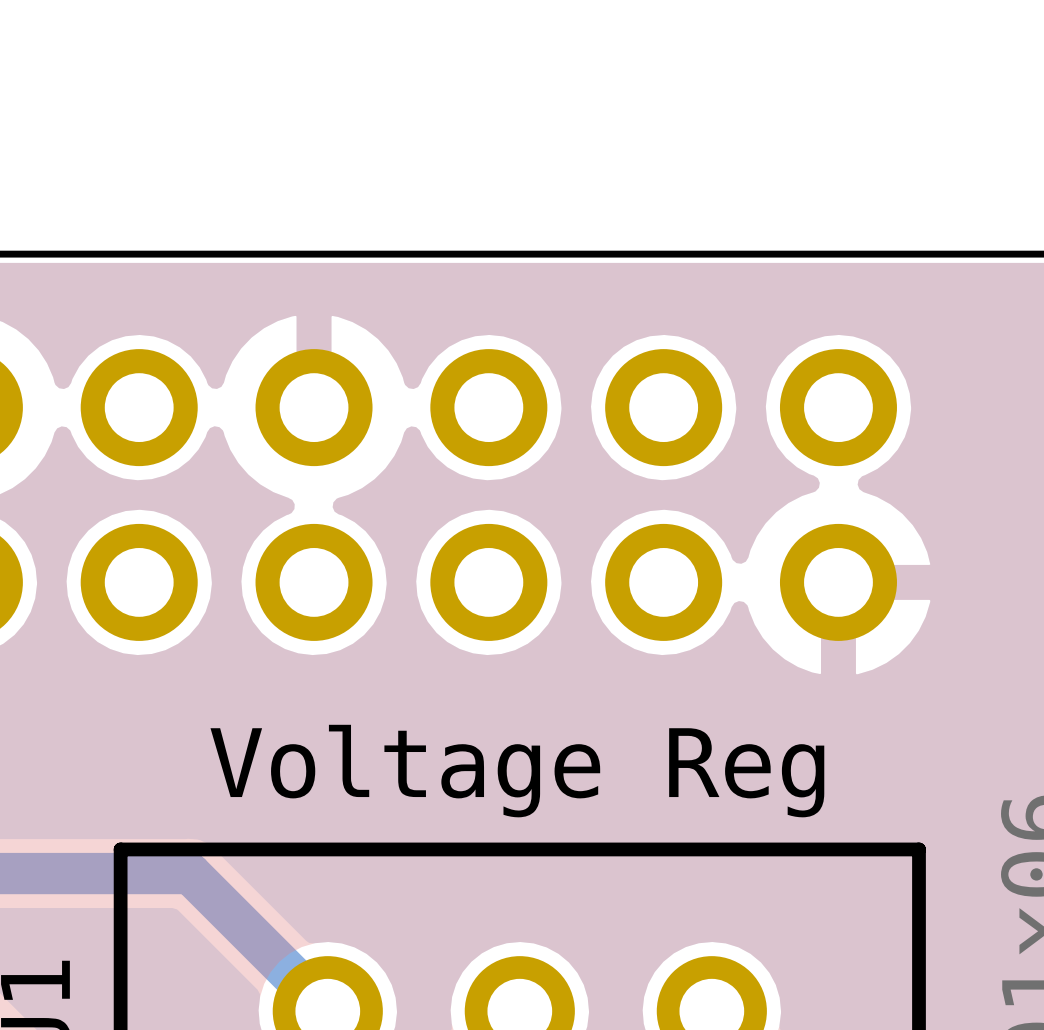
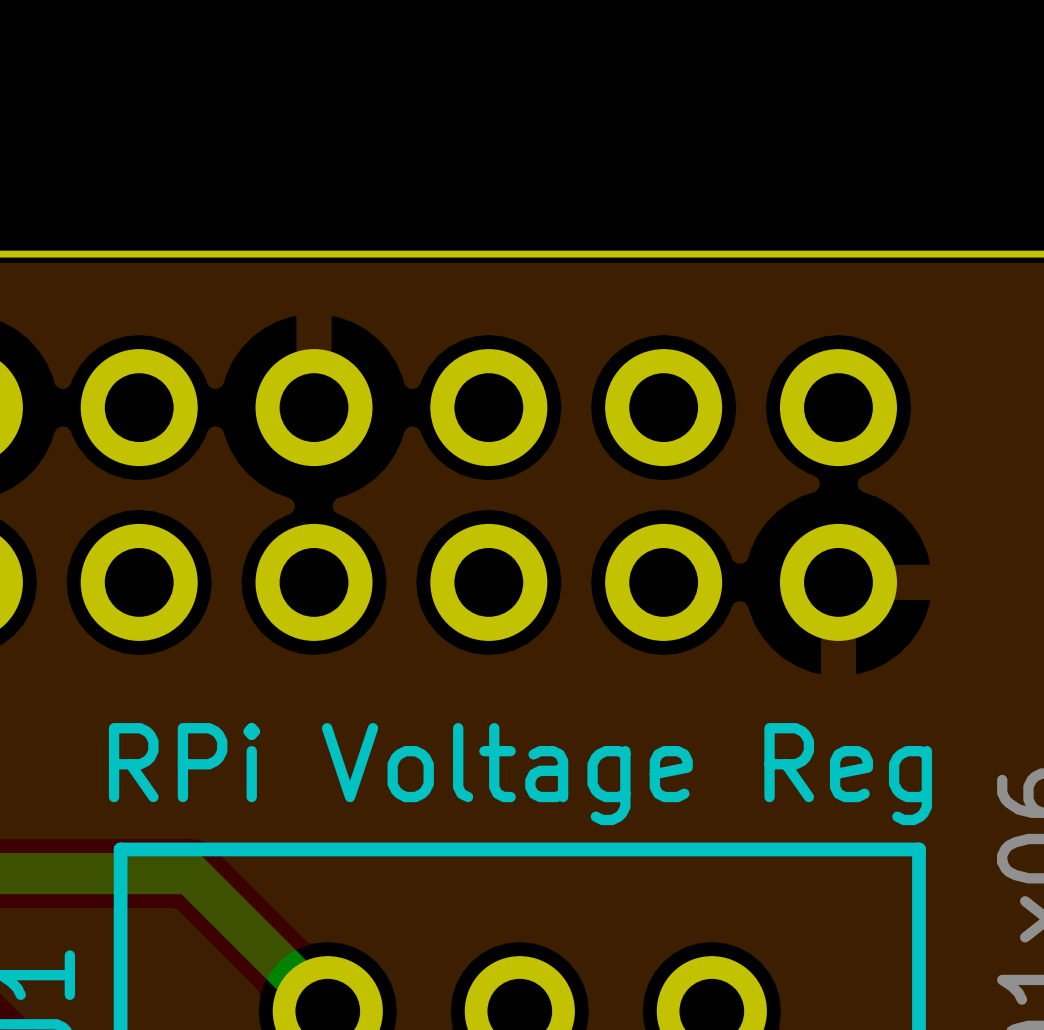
text: Voltage Reg (517, 771) -> RPi Voltage Reg (520, 774)

